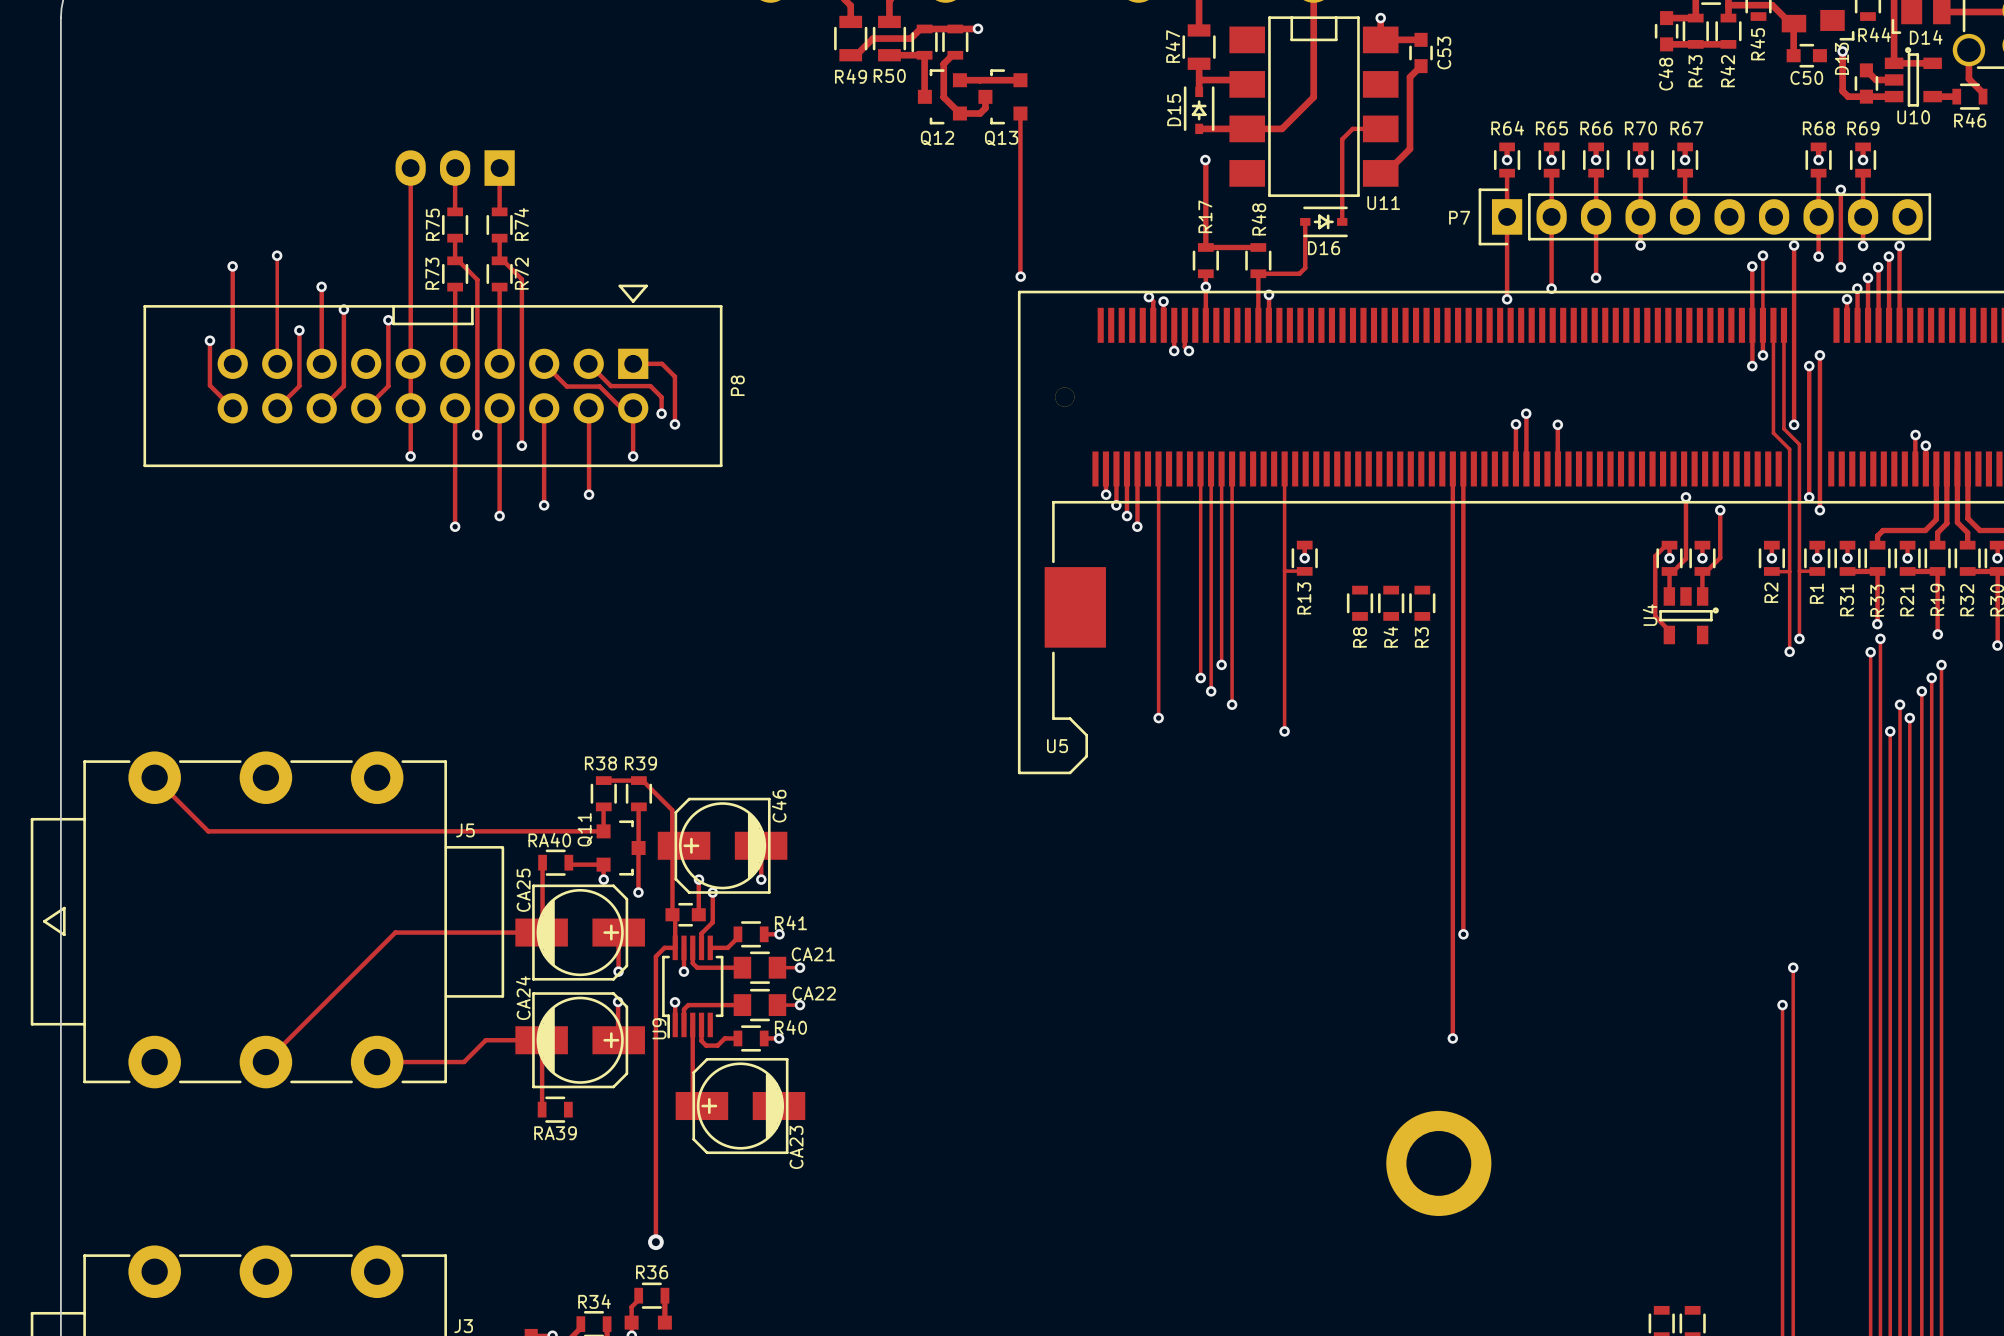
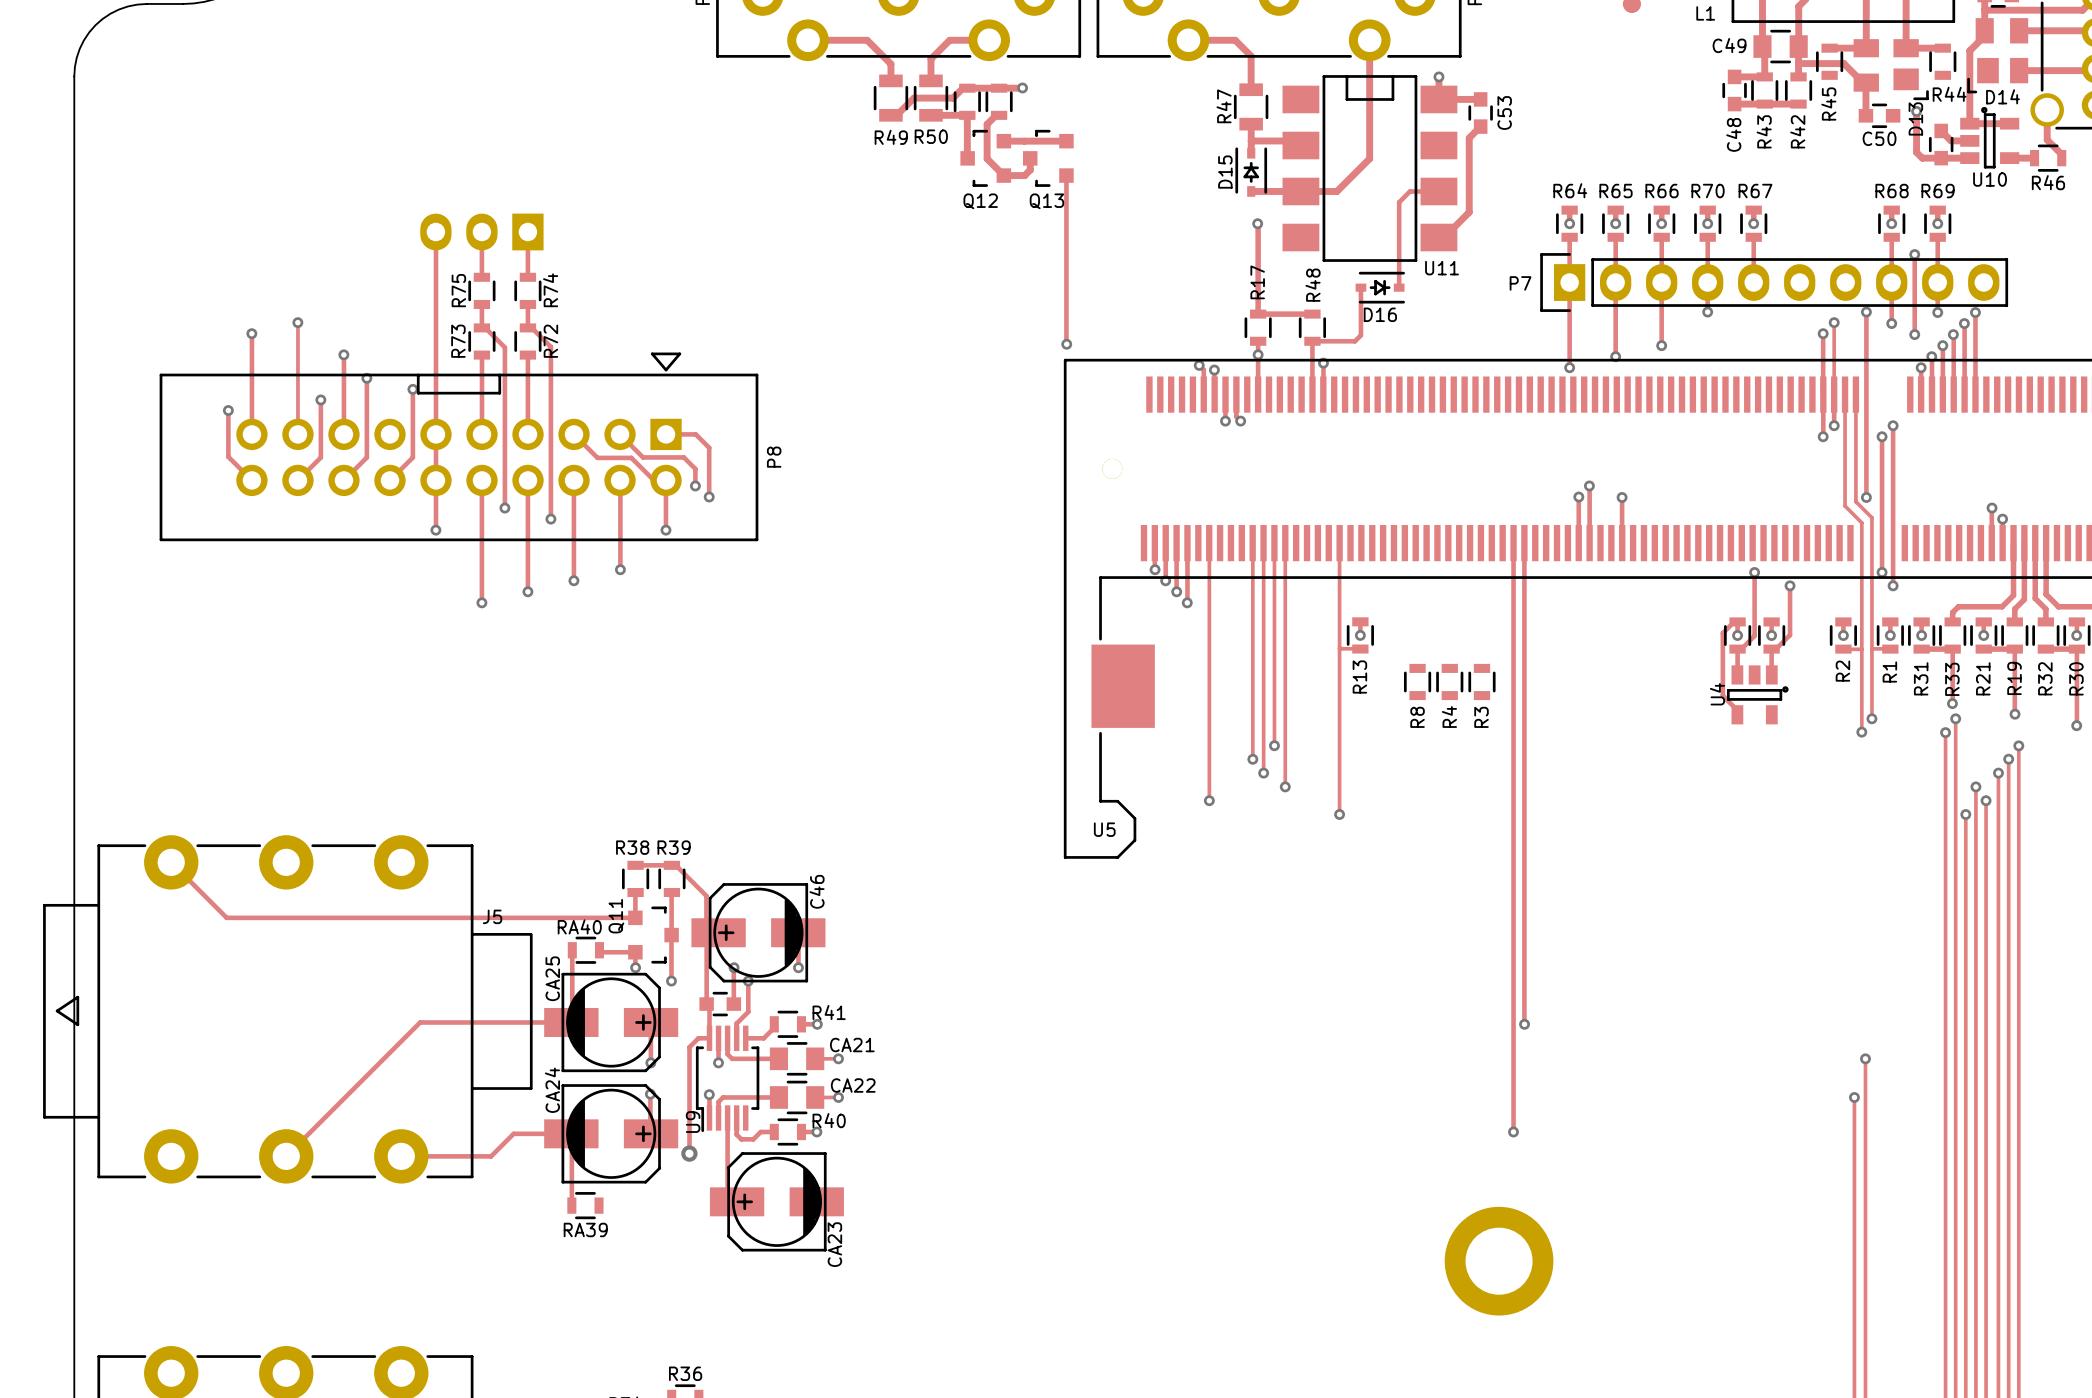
track: (655, 1059) (655, 1242) -> none
via: none -> (689, 1153)
via: (655, 1242) -> none

